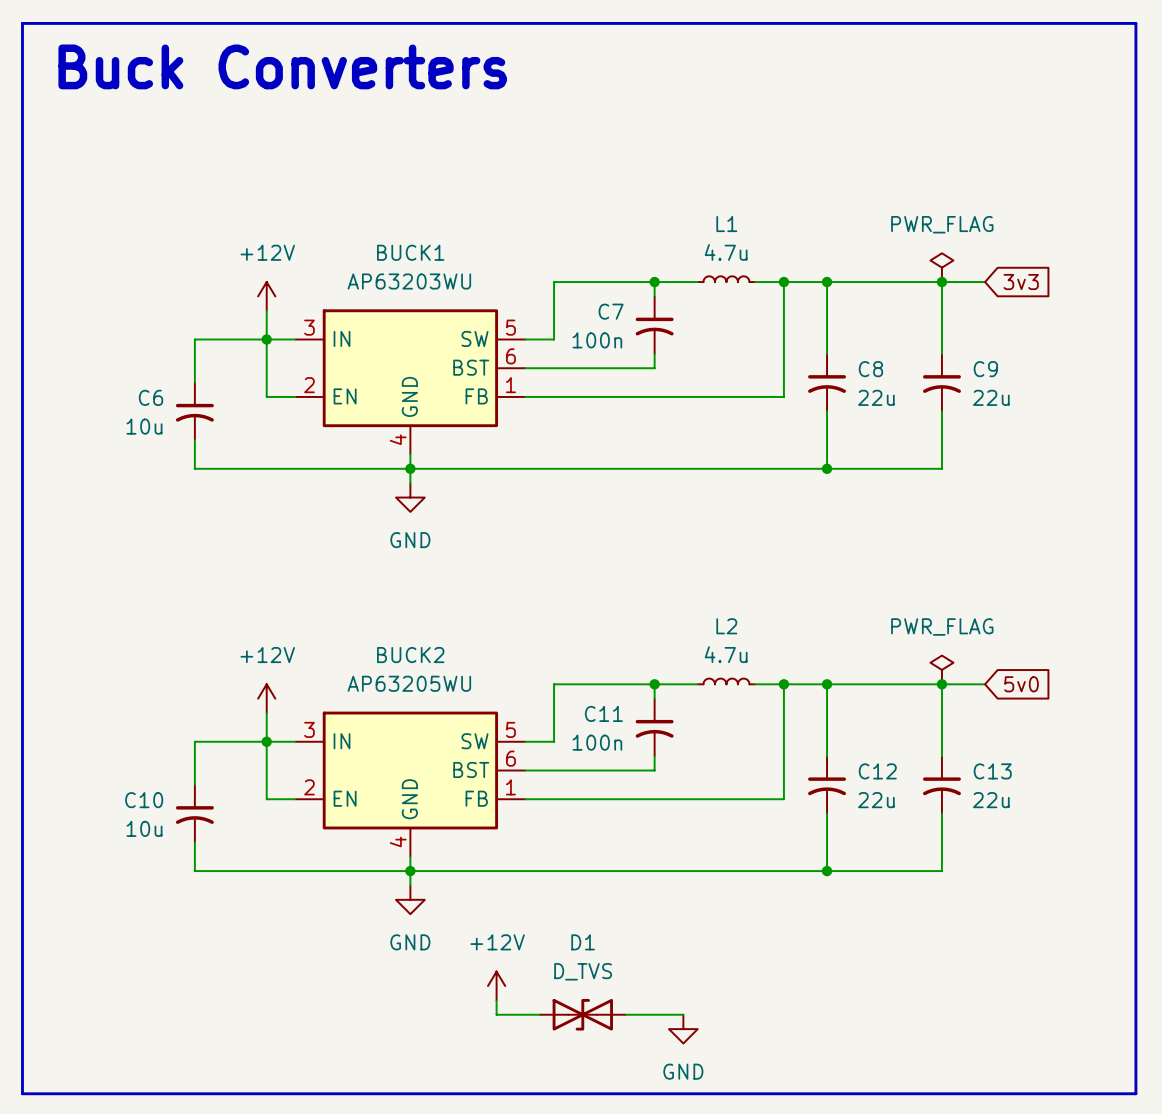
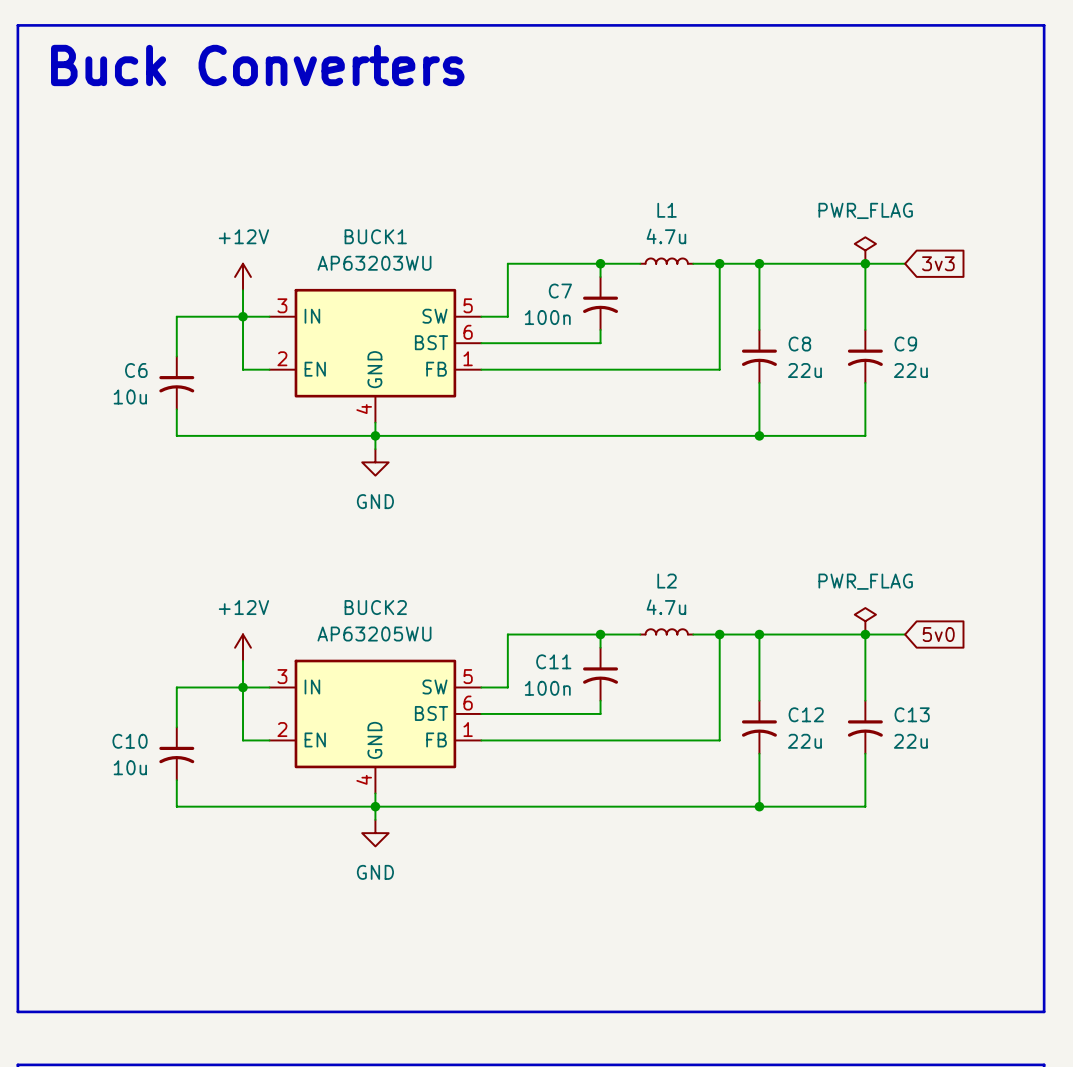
power symbol: +12V (496, 986) -> none
wire: (496, 1000) (496, 1014) (539, 1014) -> none
D1: D_TVS (582, 1014) -> none
wire: (625, 1014) (683, 1014) -> none
power symbol: GND (683, 1029) -> none

